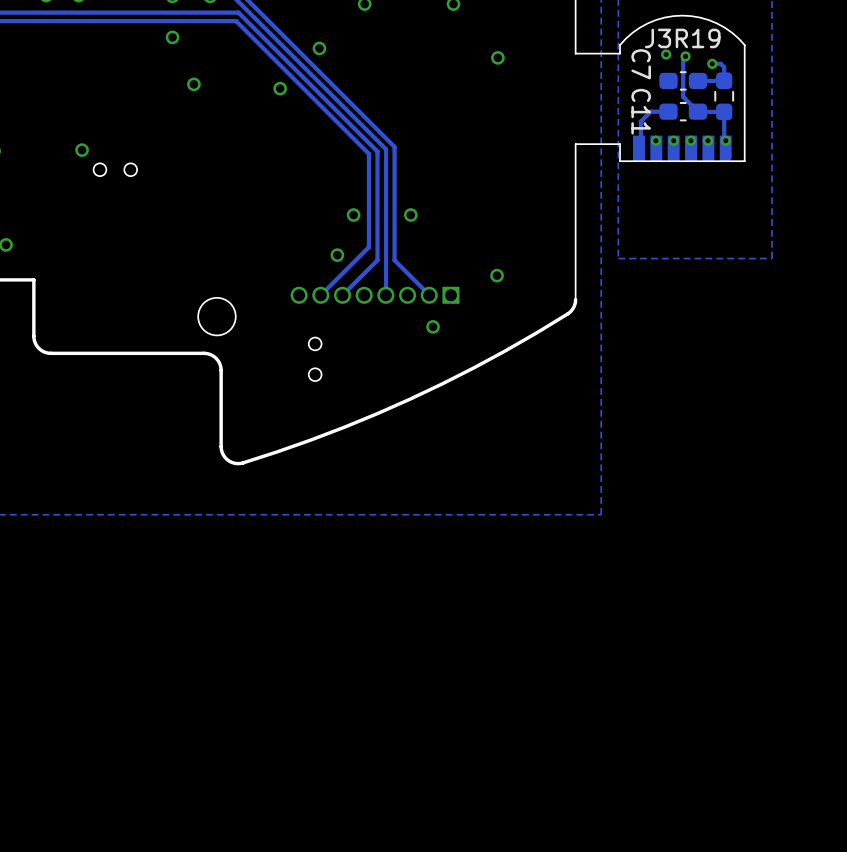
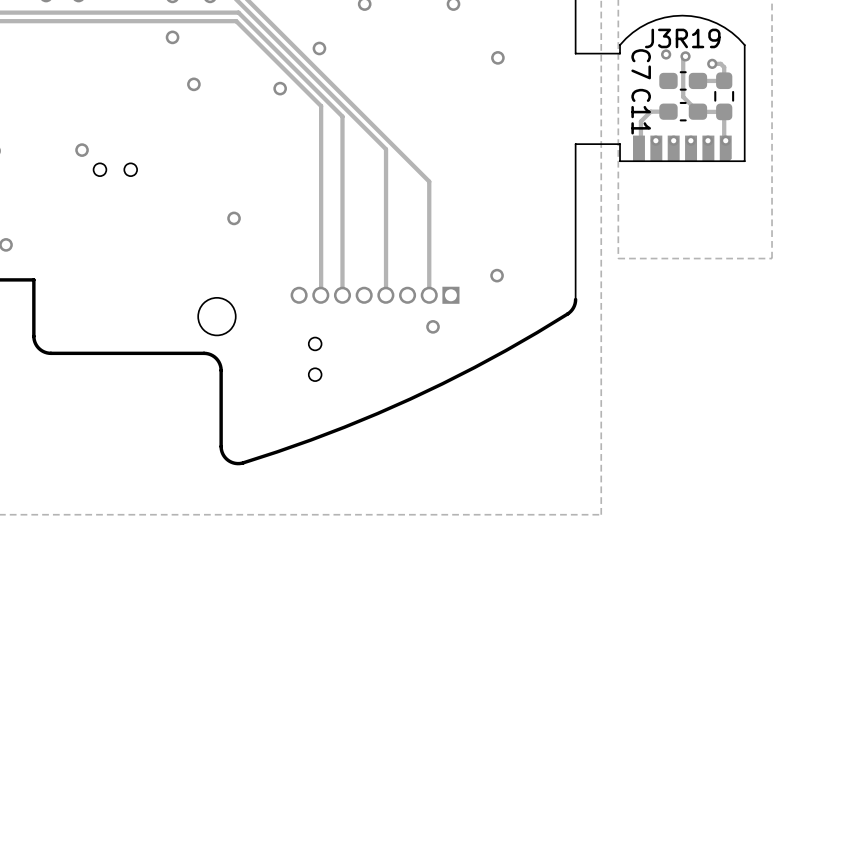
track: (321, 106) (368, 153) (368, 247) (321, 294) -> (321, 106) (321, 294)
track: (342, 116) (377, 151) (377, 260) (342, 295) -> (342, 116) (342, 295)
track: (394, 146) (394, 260) (429, 294) -> (394, 146) (429, 181) (429, 294)
via: (353, 215) -> none
via: (410, 215) -> none
via: none -> (234, 218)
via: (337, 255) -> none

